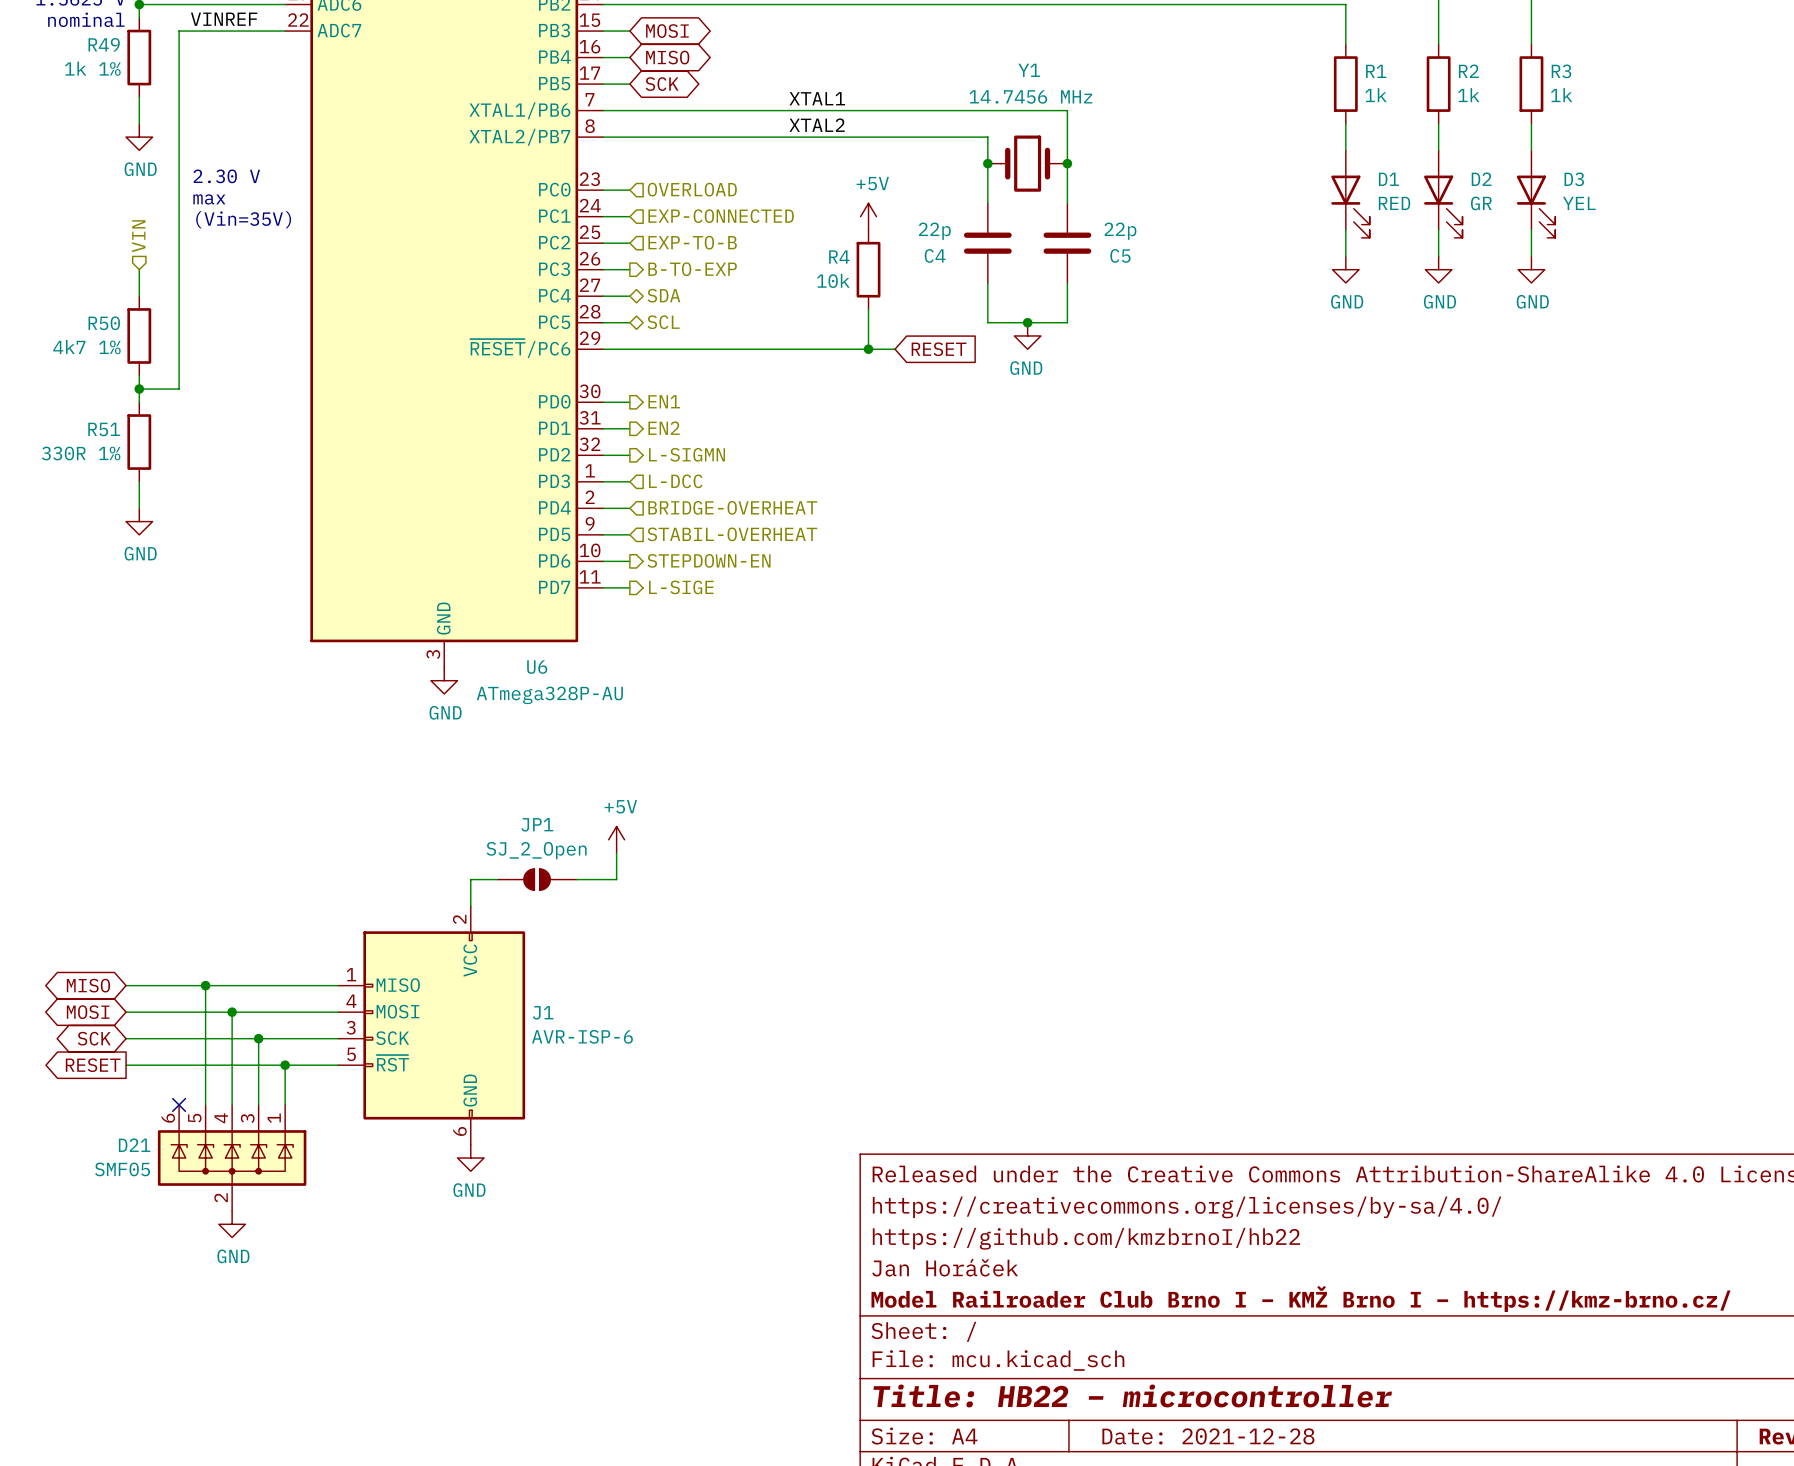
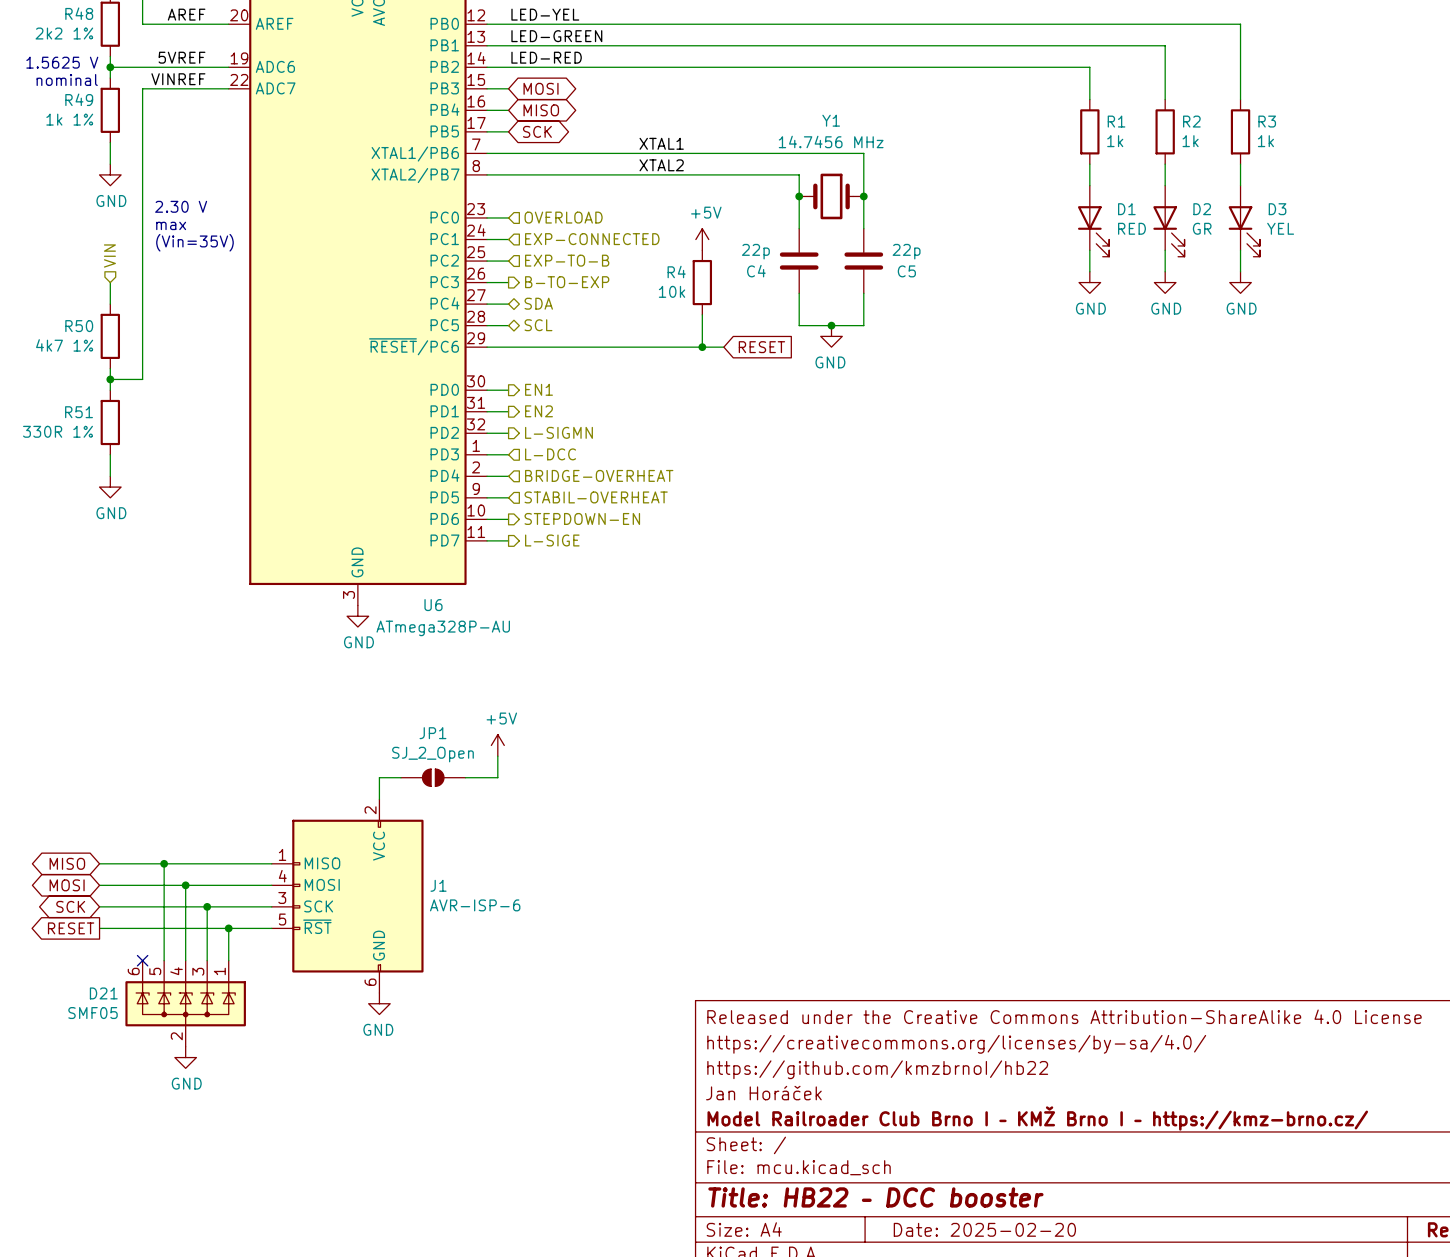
title block: Title: HB22 – microcontroller (1132, 1395) -> Title: HB22 – DCC booster (875, 1197)
title block: Date: 2021-12-28 (1208, 1436) -> Date: 2025-02-20 (984, 1229)

